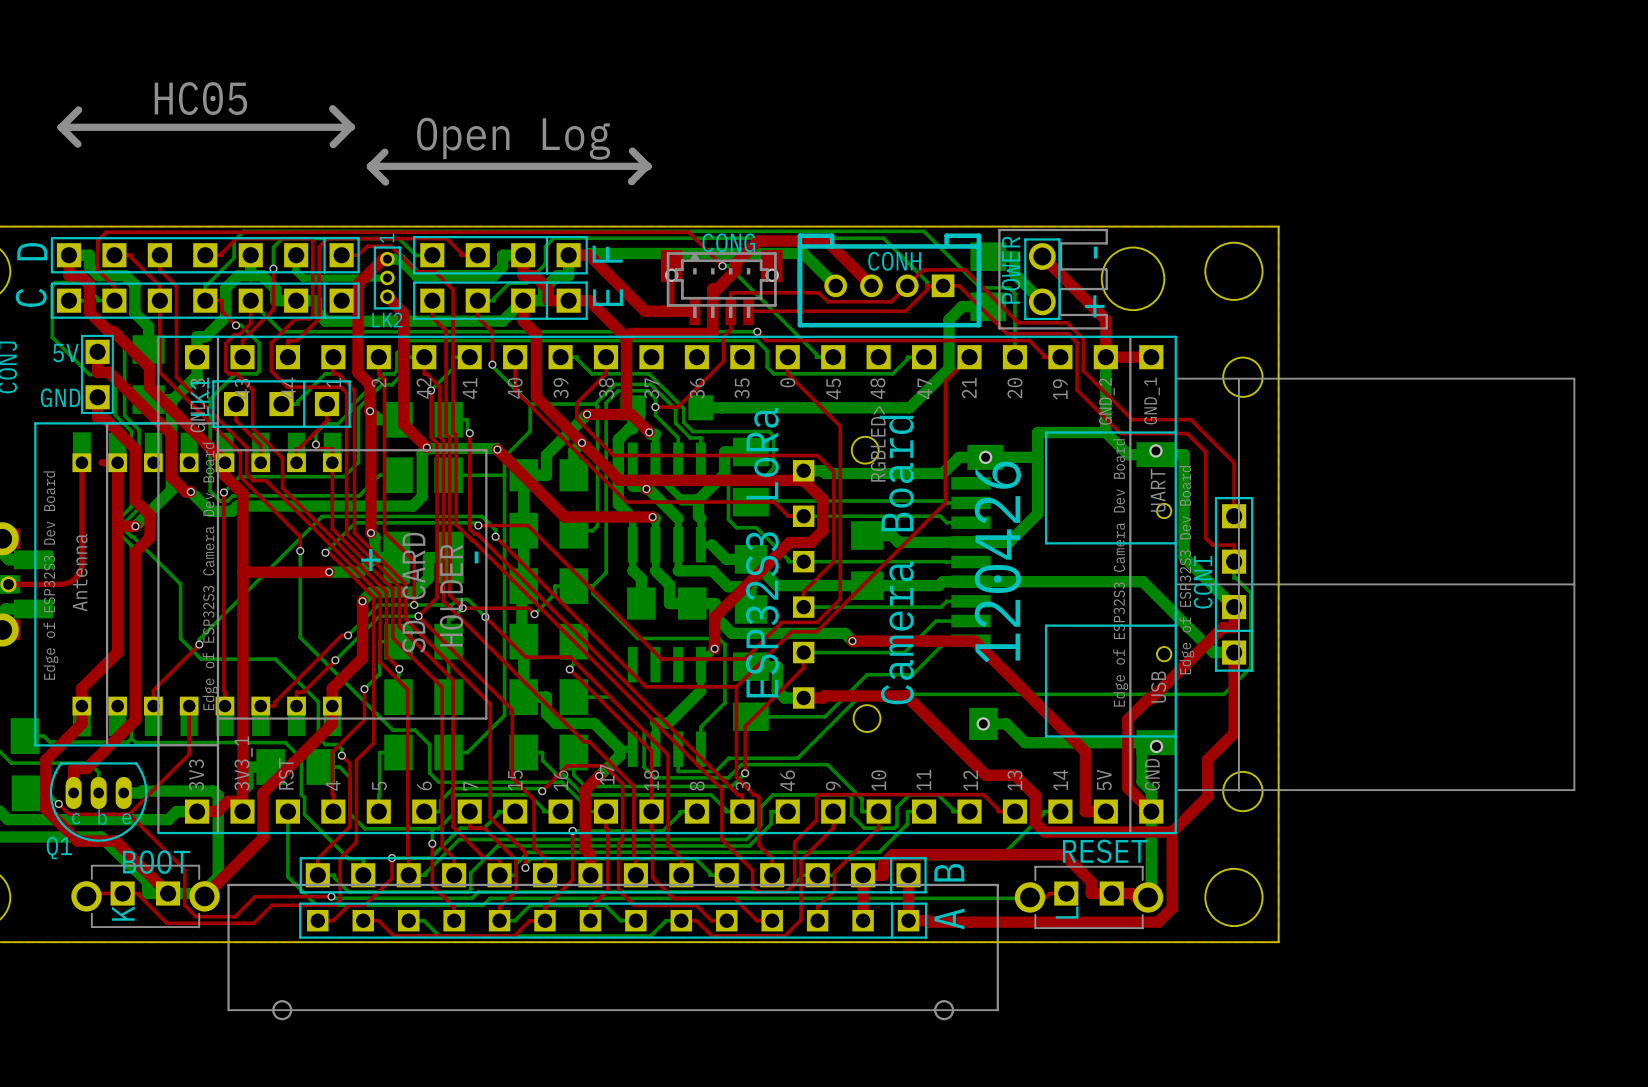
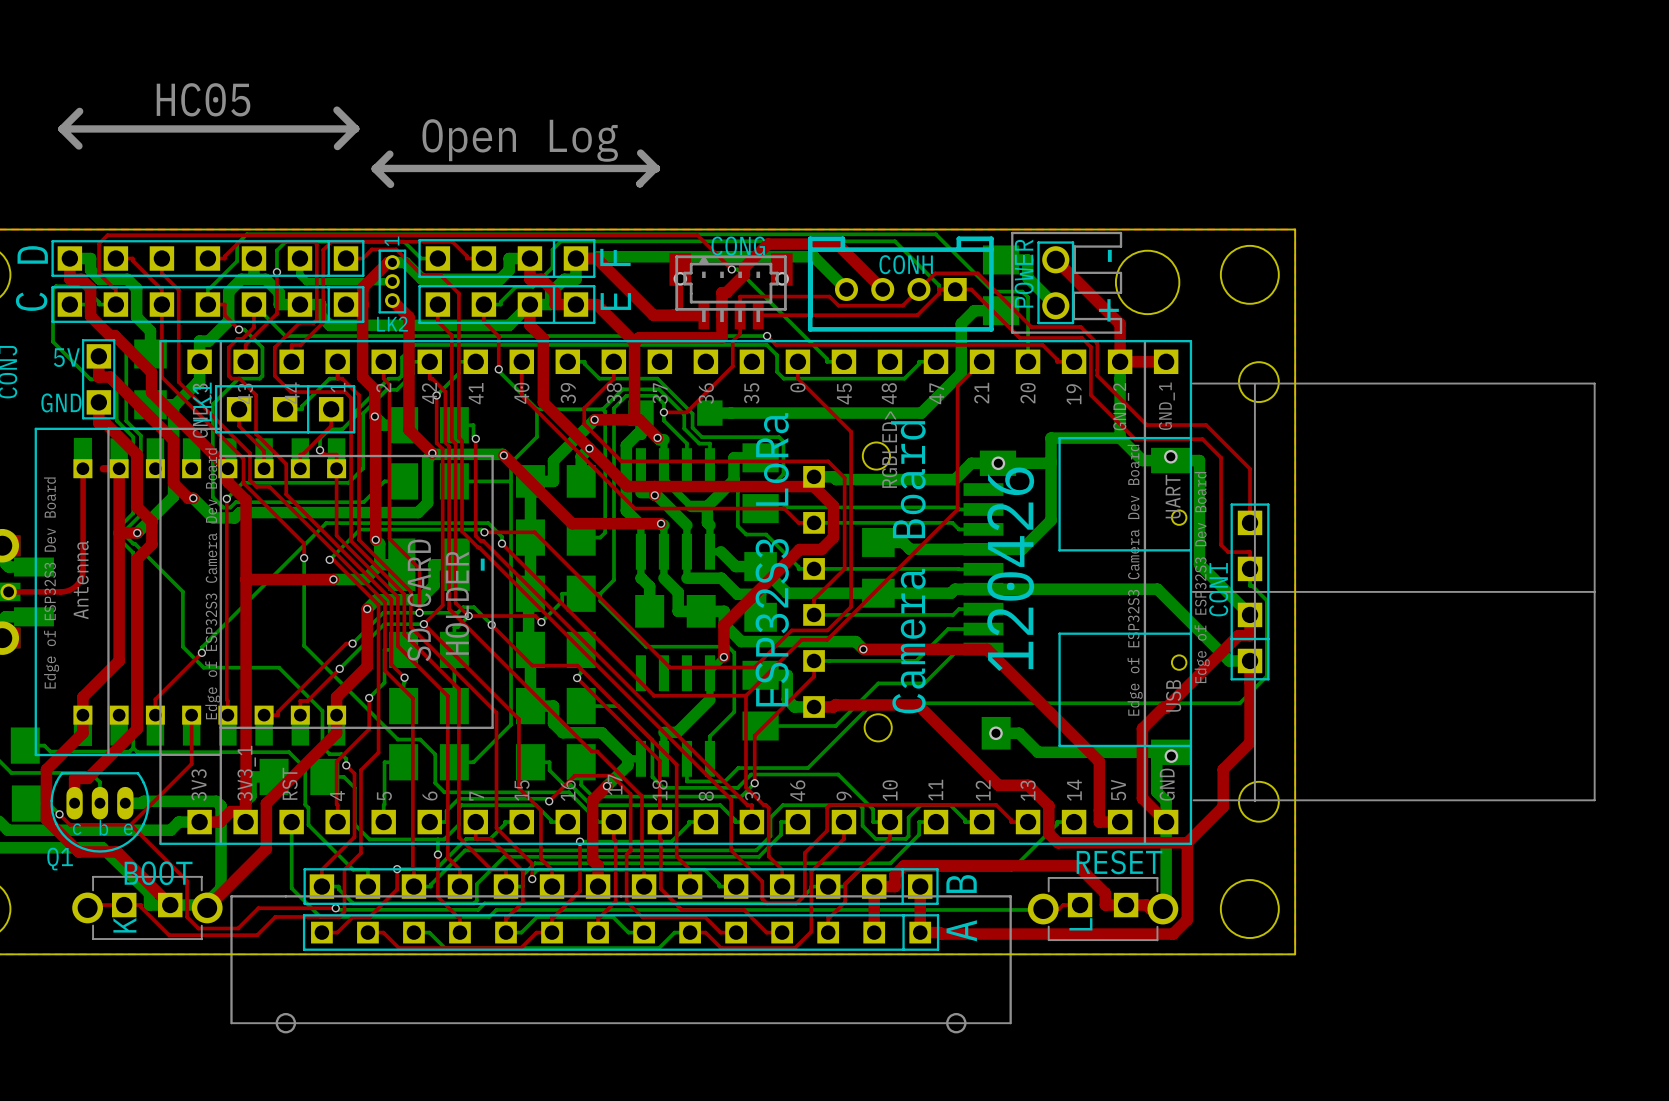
text: + (370, 560) -> none

